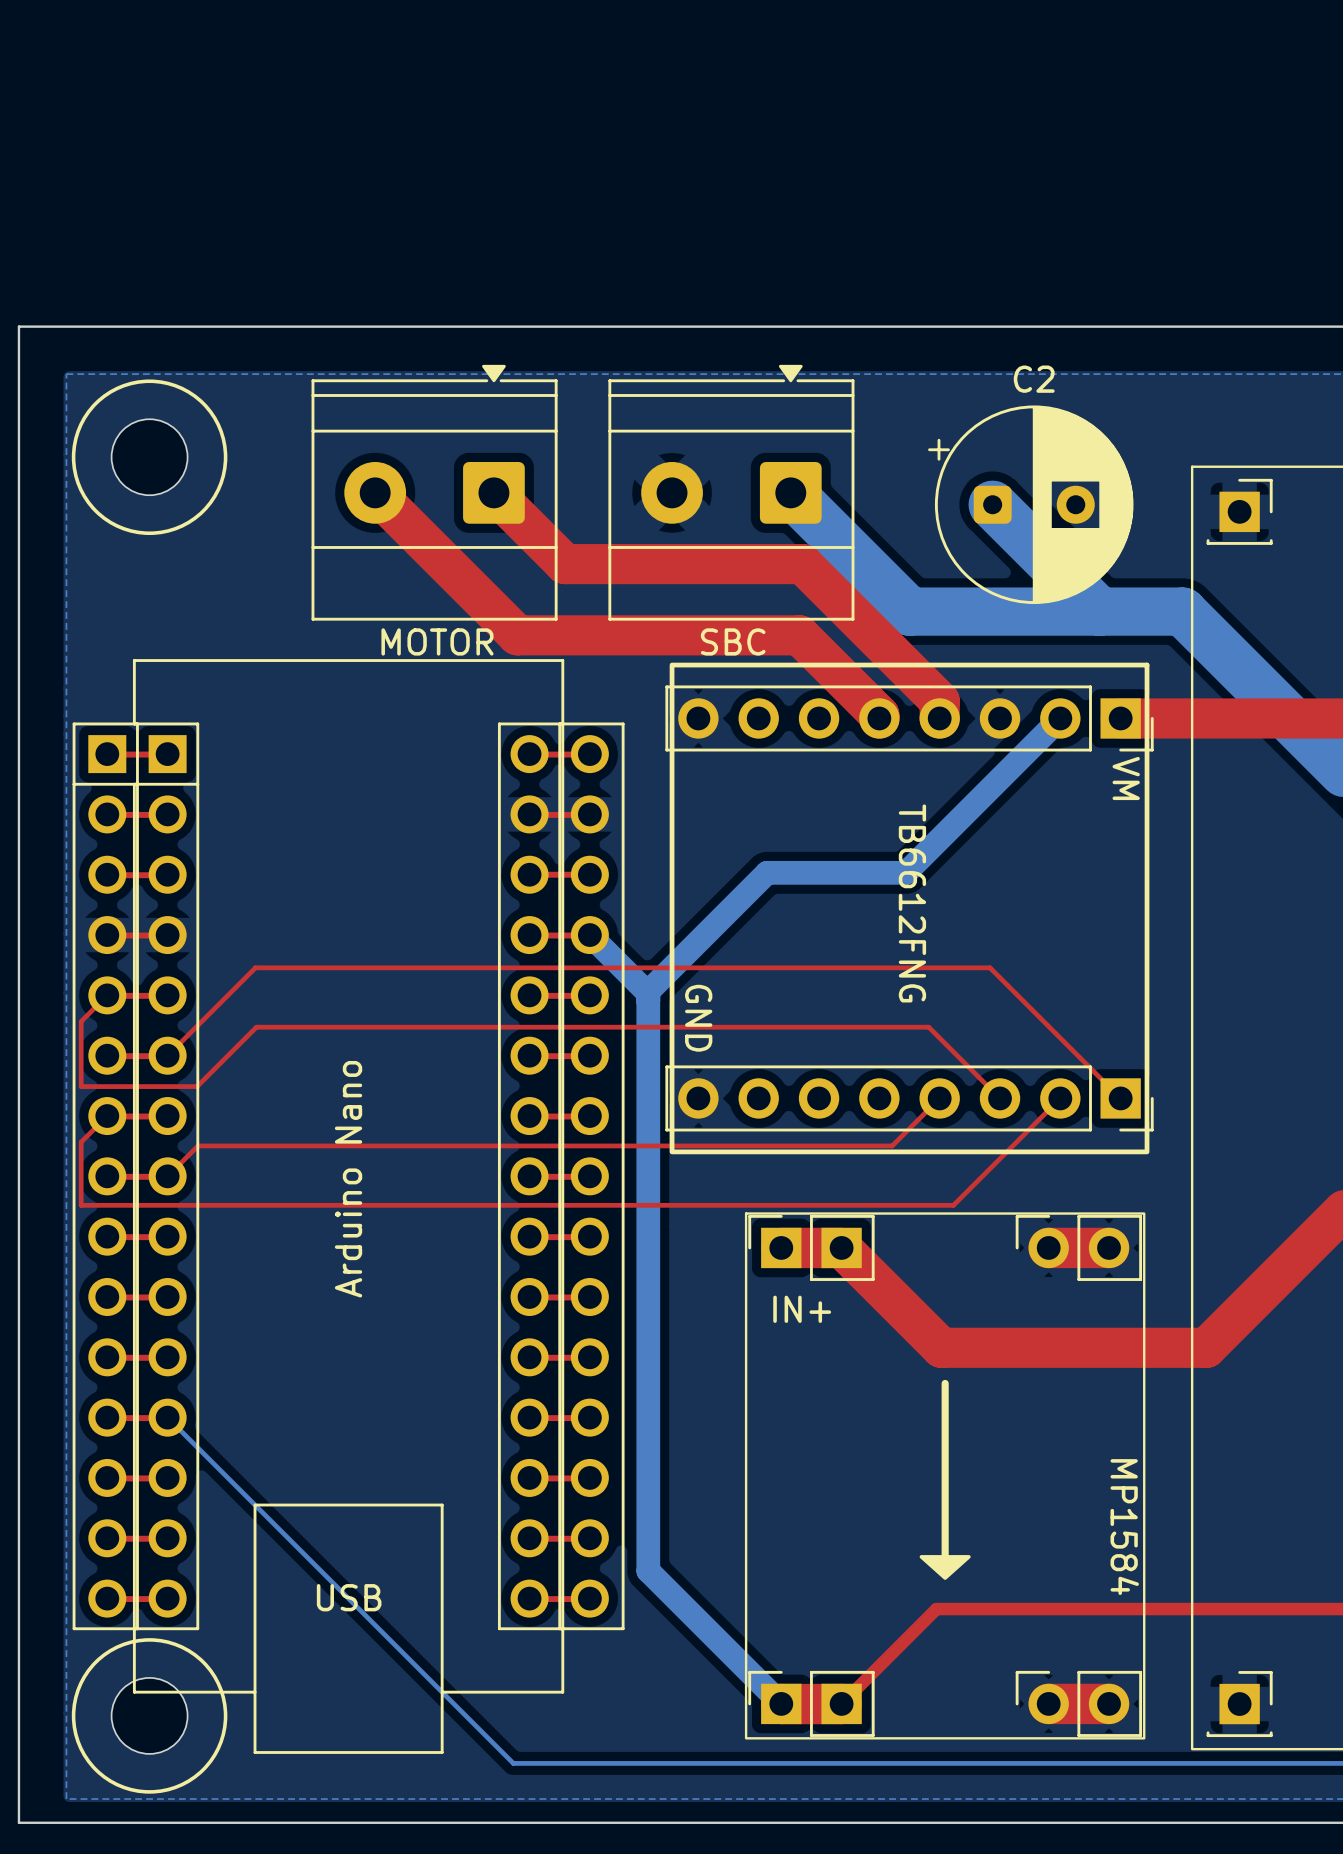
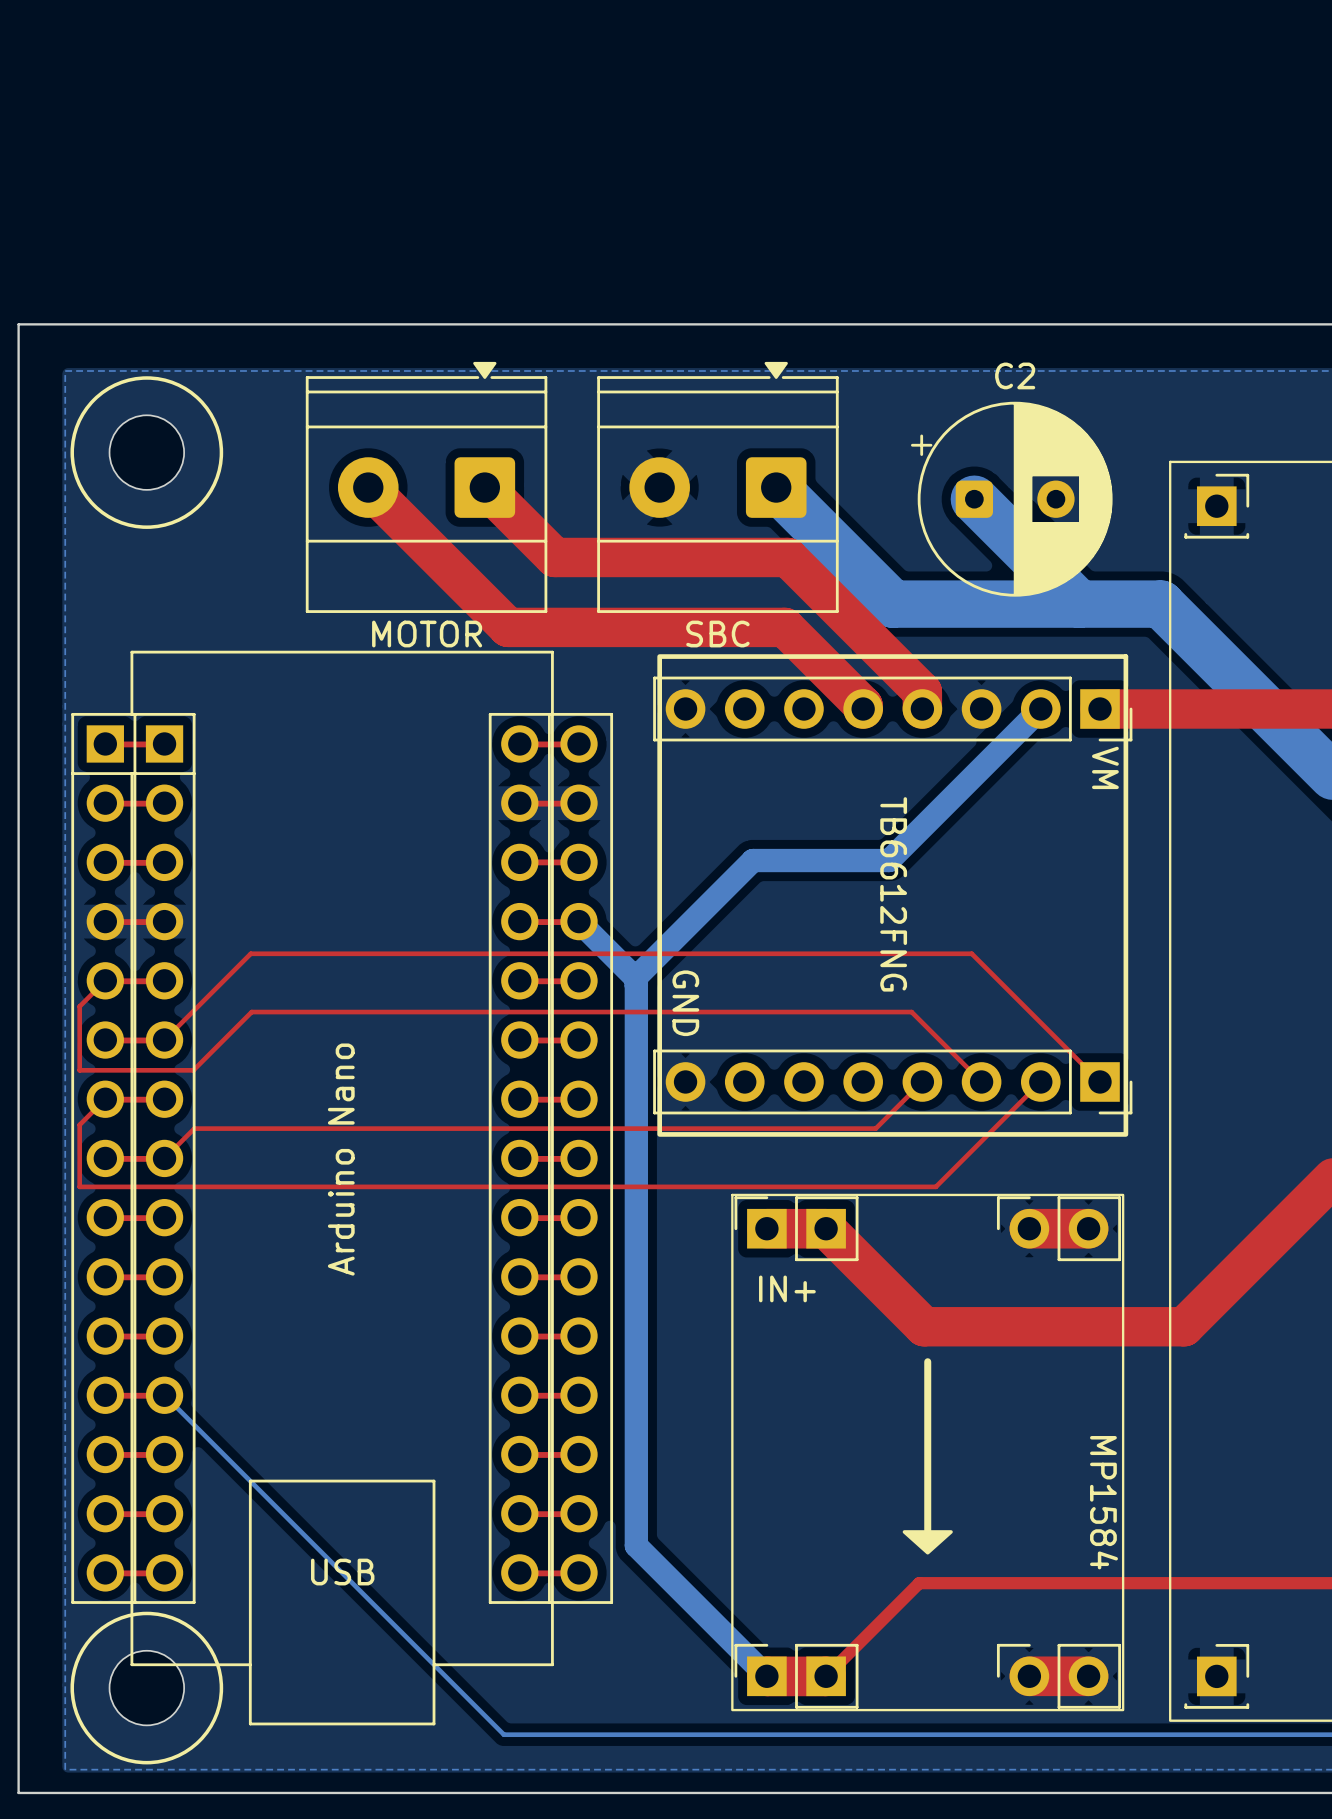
text: MOTOR (437, 641) -> none
text: SBC (733, 641) -> none
MOTOR name: none -> MOTOR (427, 634)
SBC name: none -> SBC (717, 634)
text: TB6612FNG (912, 903) -> none
TB6612FNG name: none -> TB6612FNG (893, 894)
Arduino Nano name: none -> Arduino Nano (341, 1159)
text: Arduino Nano (348, 1179) -> none

